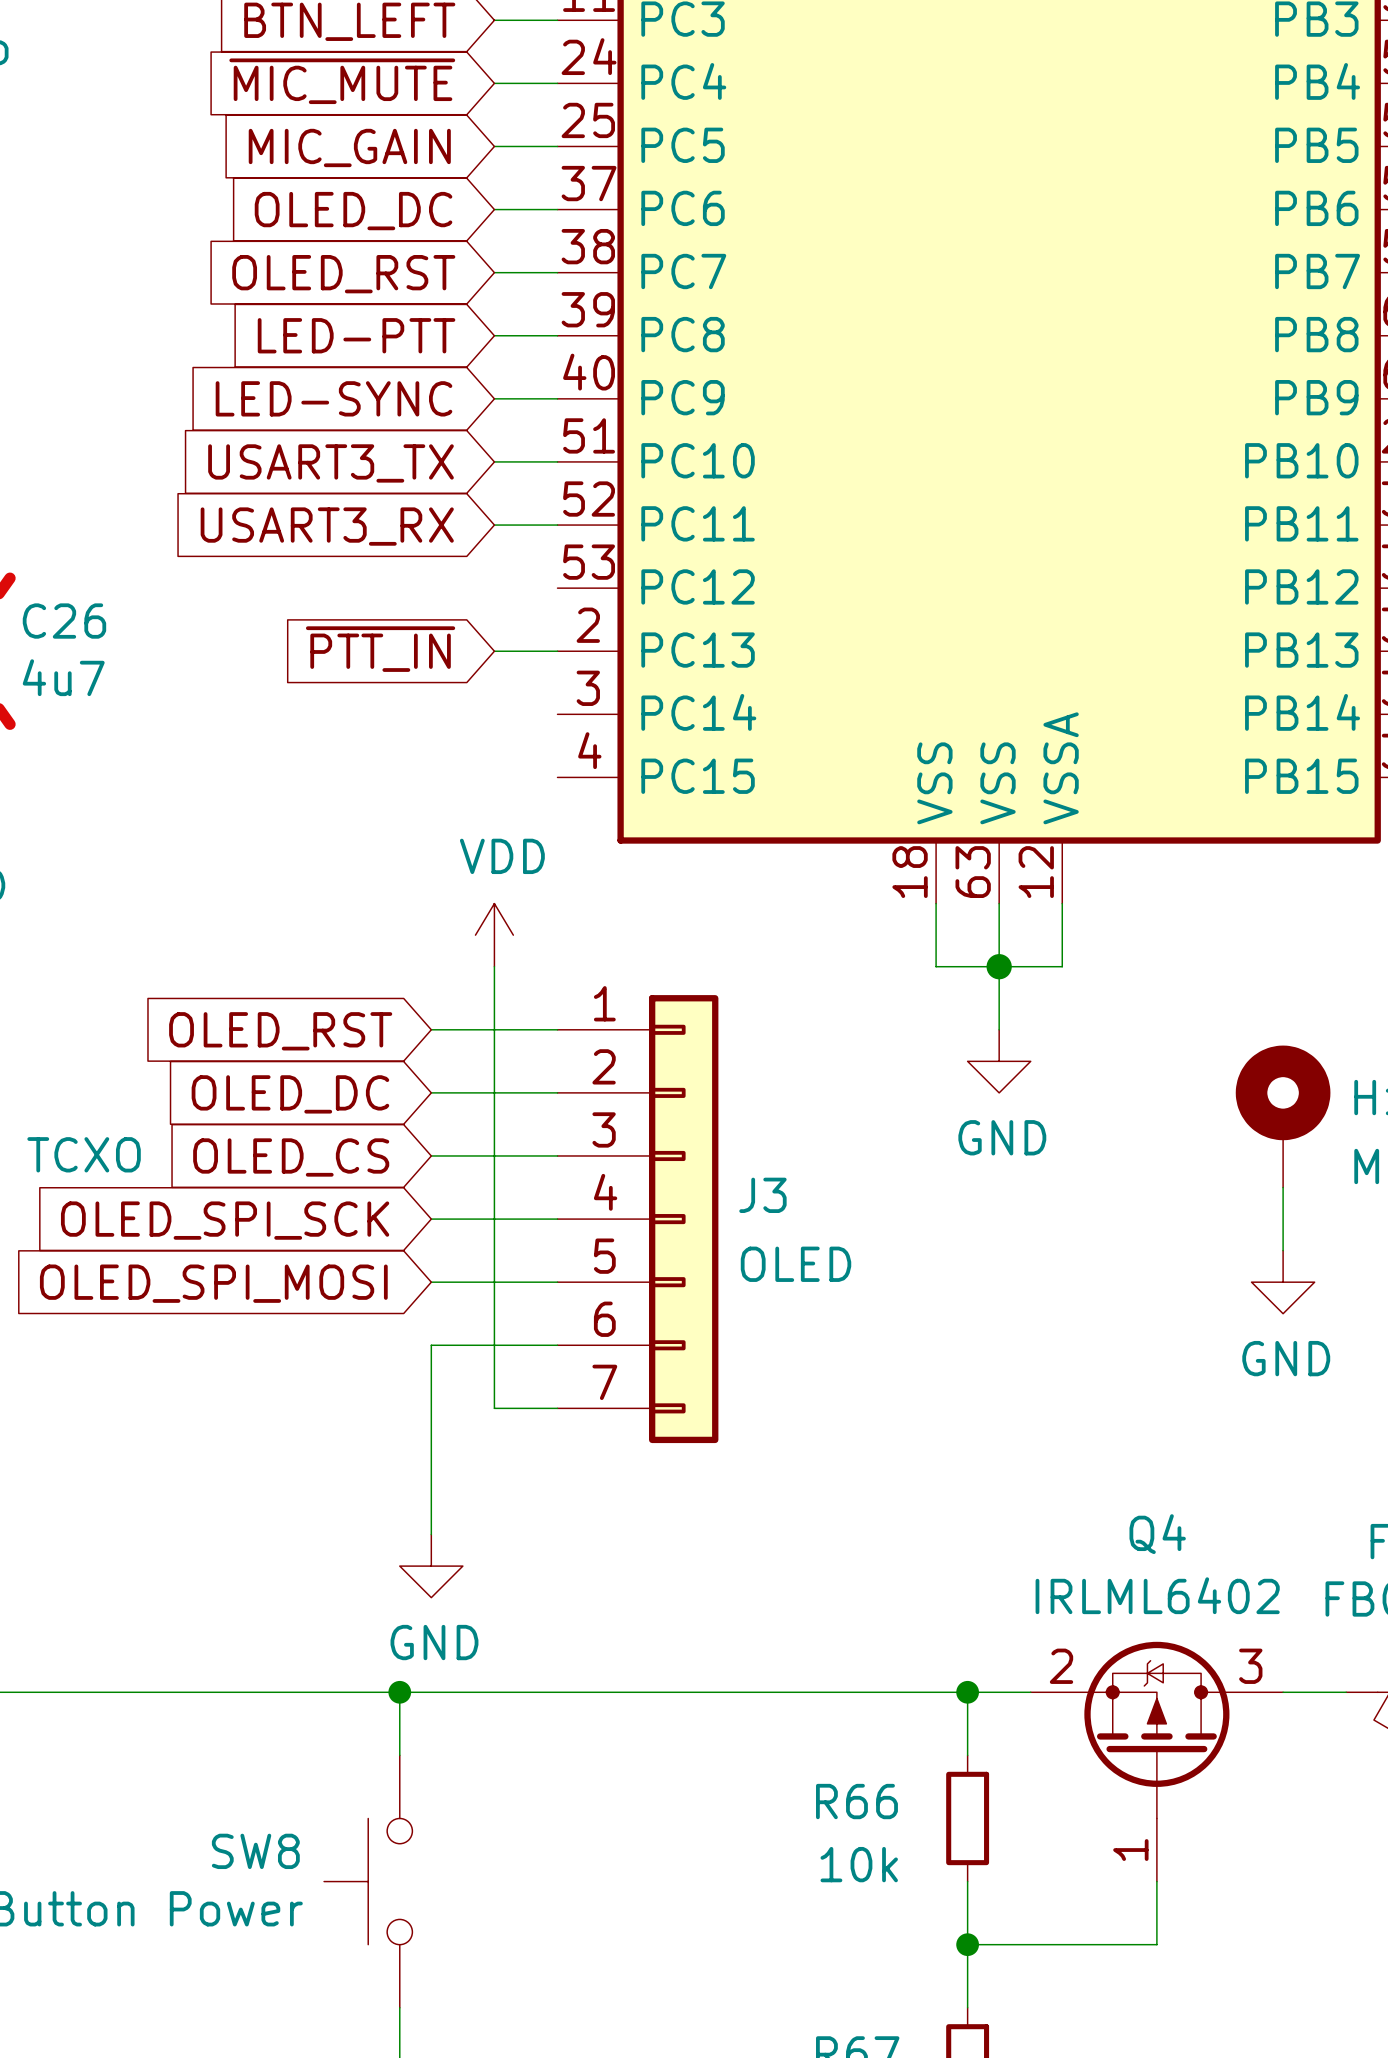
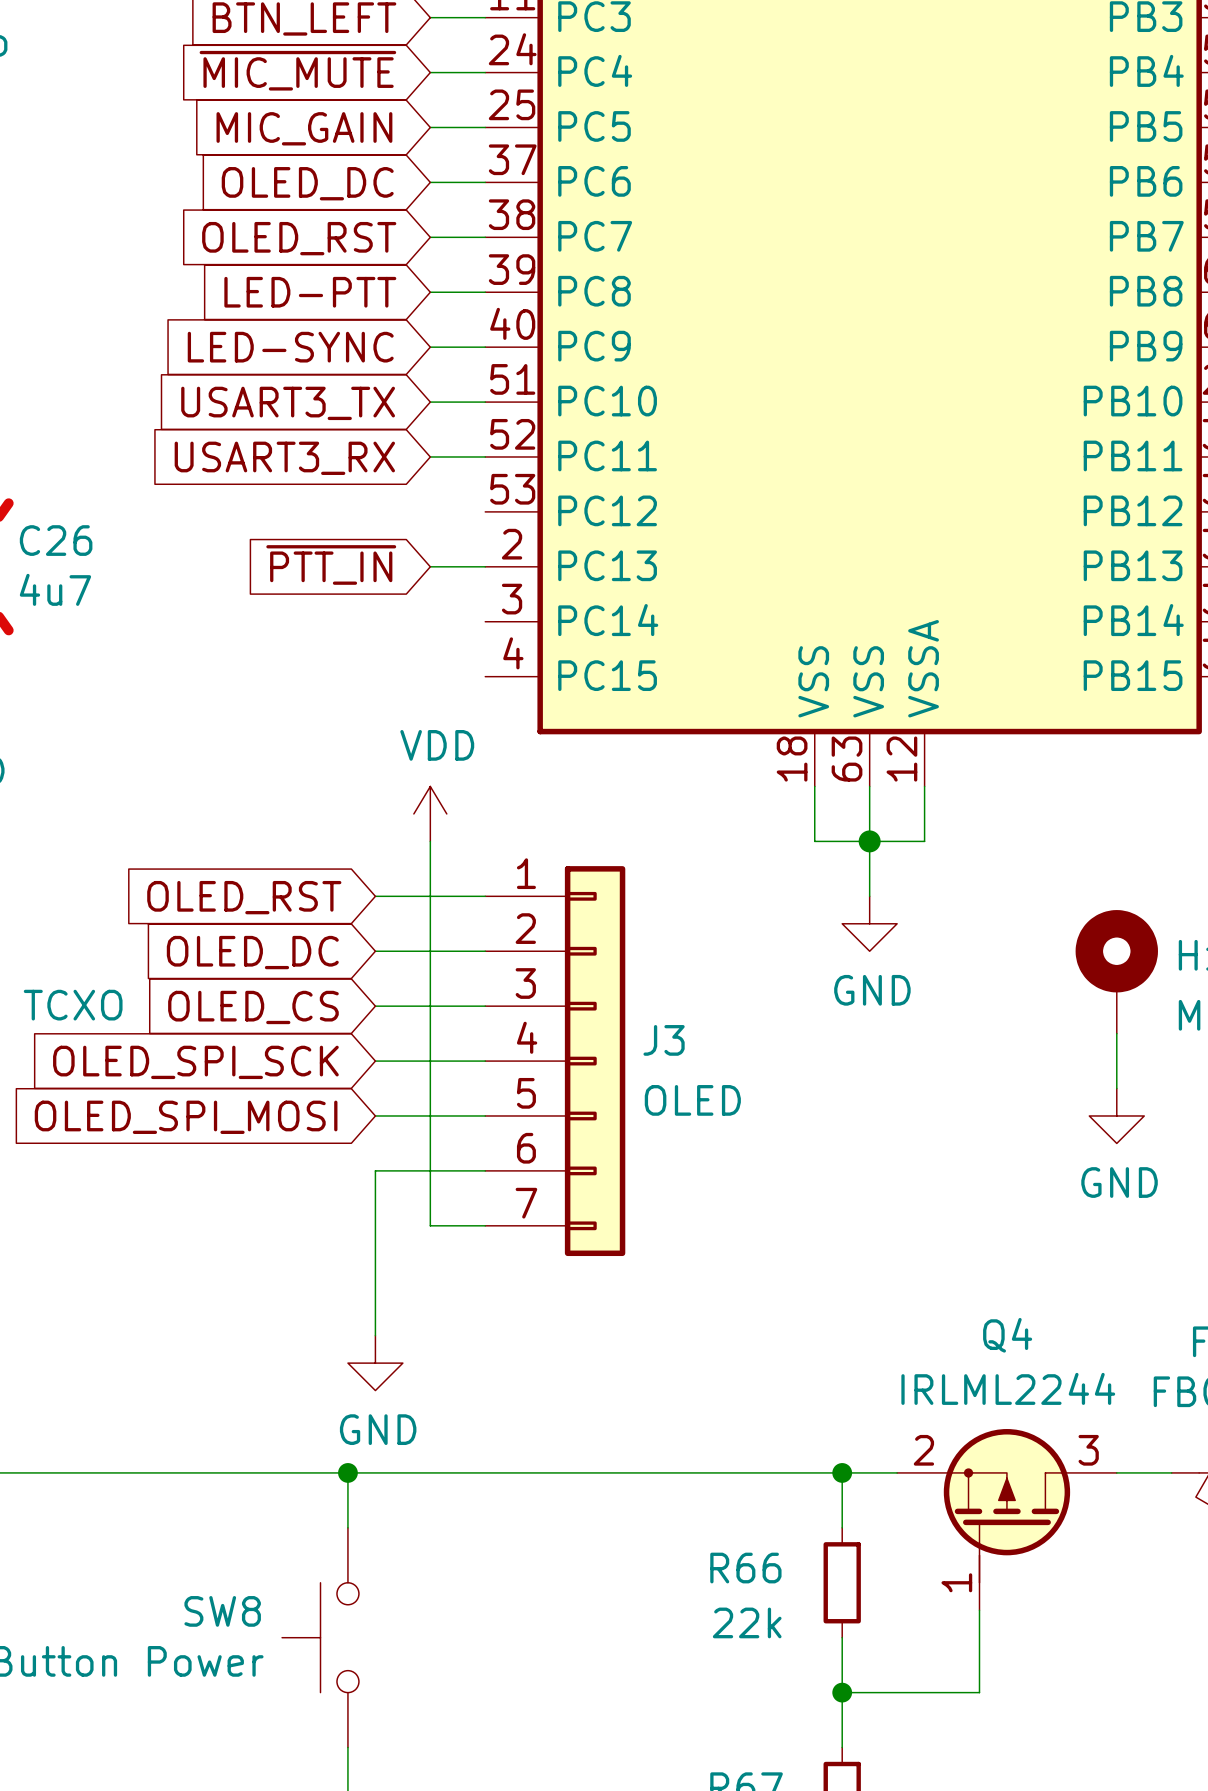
Q4 value: IRLML6402 (1157, 1595) -> IRLML2244 (1008, 1388)
Q4 symbol: [1030, 1641, 1284, 1882] -> [897, 1429, 1117, 1611]
R66 value: 10k (859, 1864) -> 22k (747, 1622)
wire: (1156, 1881) (1156, 1944) (1125, 1944) -> (979, 1610) (979, 1692)

